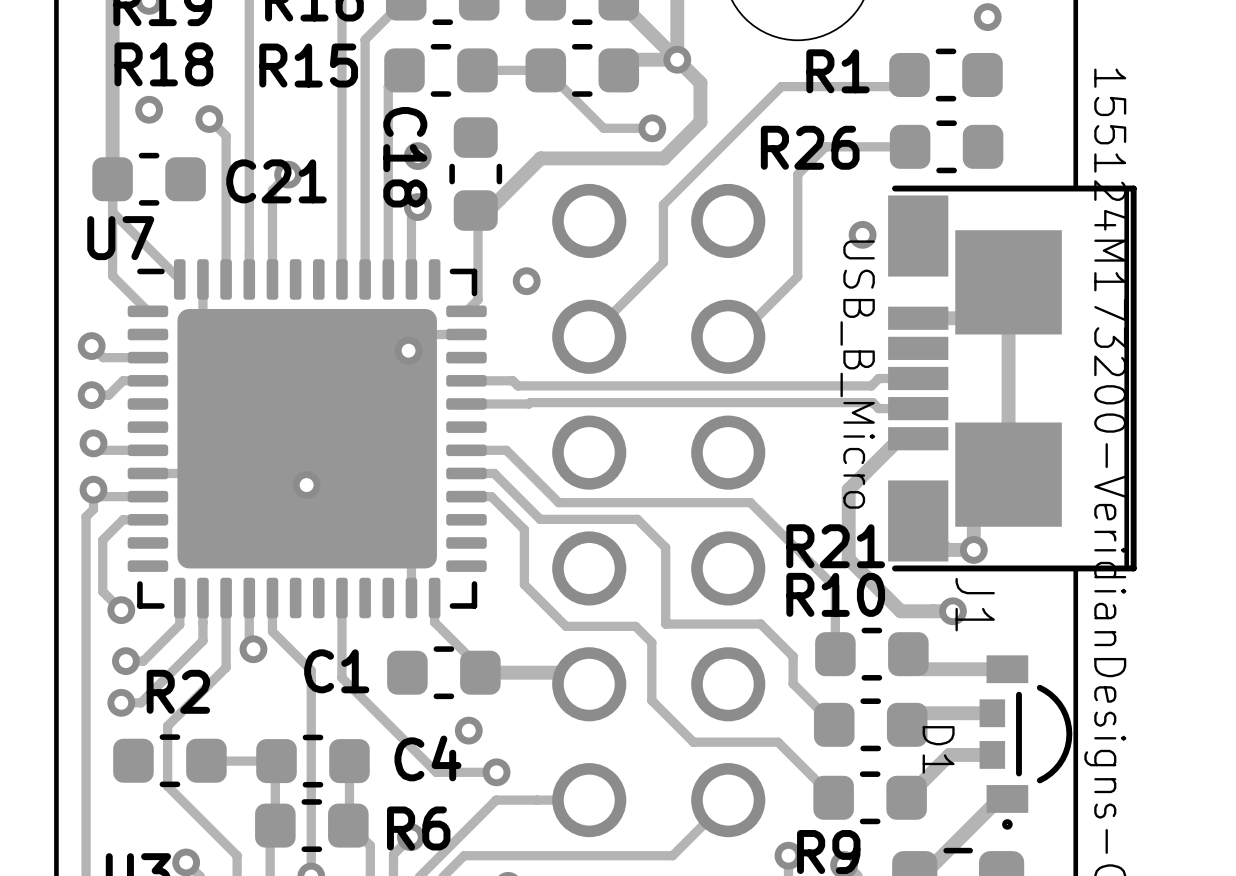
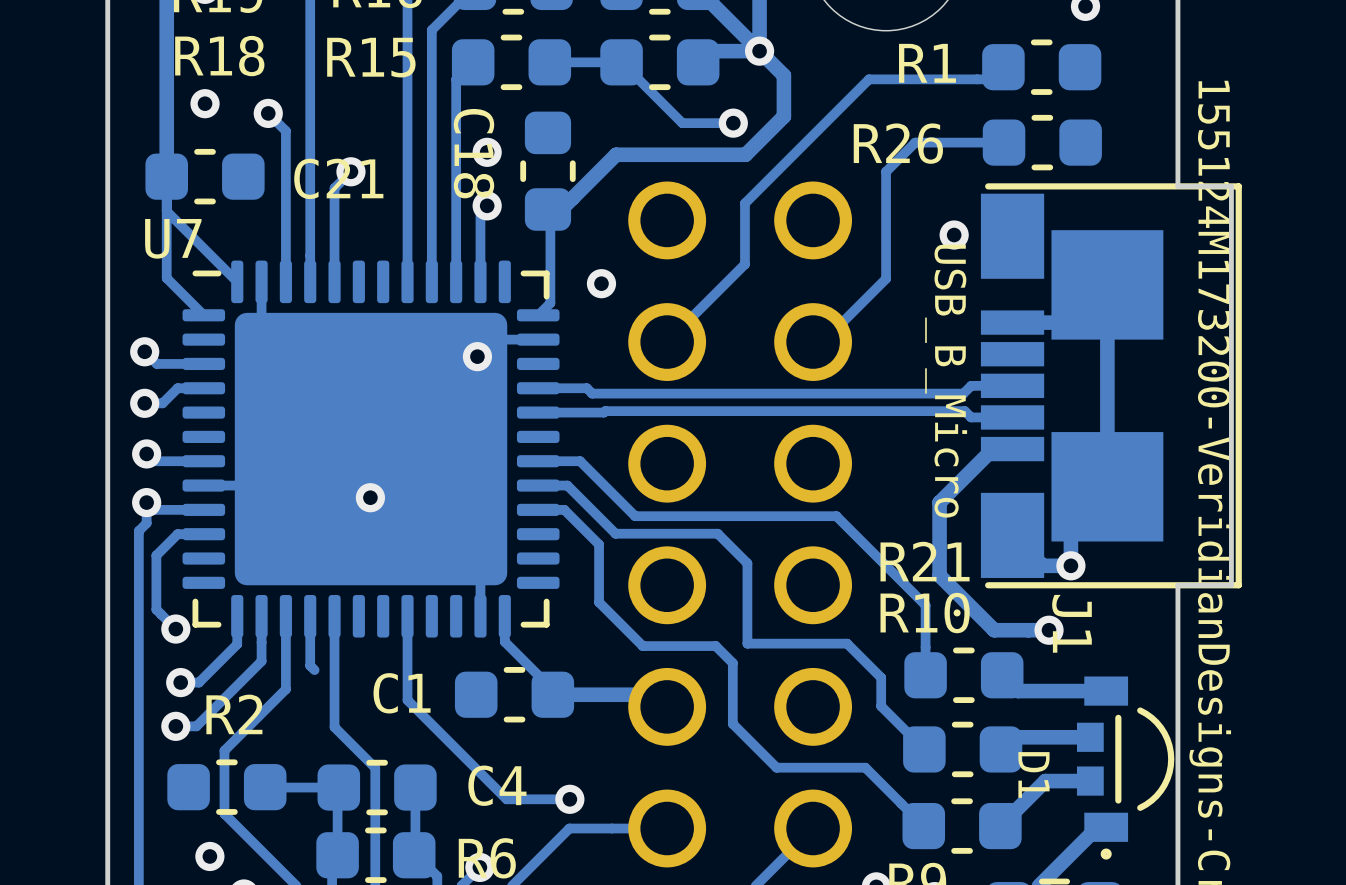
track: (272, 631) (311, 670) (311, 742) -> (334, 651) (334, 727) (375, 767)
via: (253, 649) -> none
via: (468, 730) -> none
via: none -> (209, 856)

